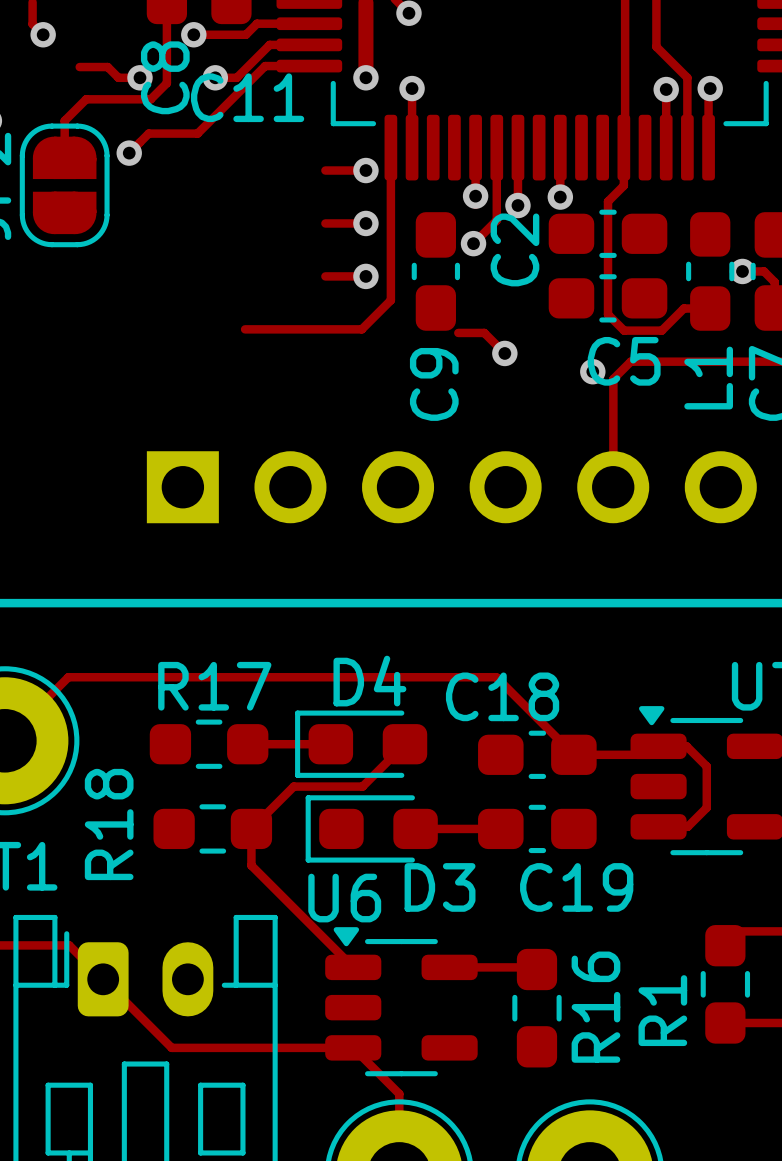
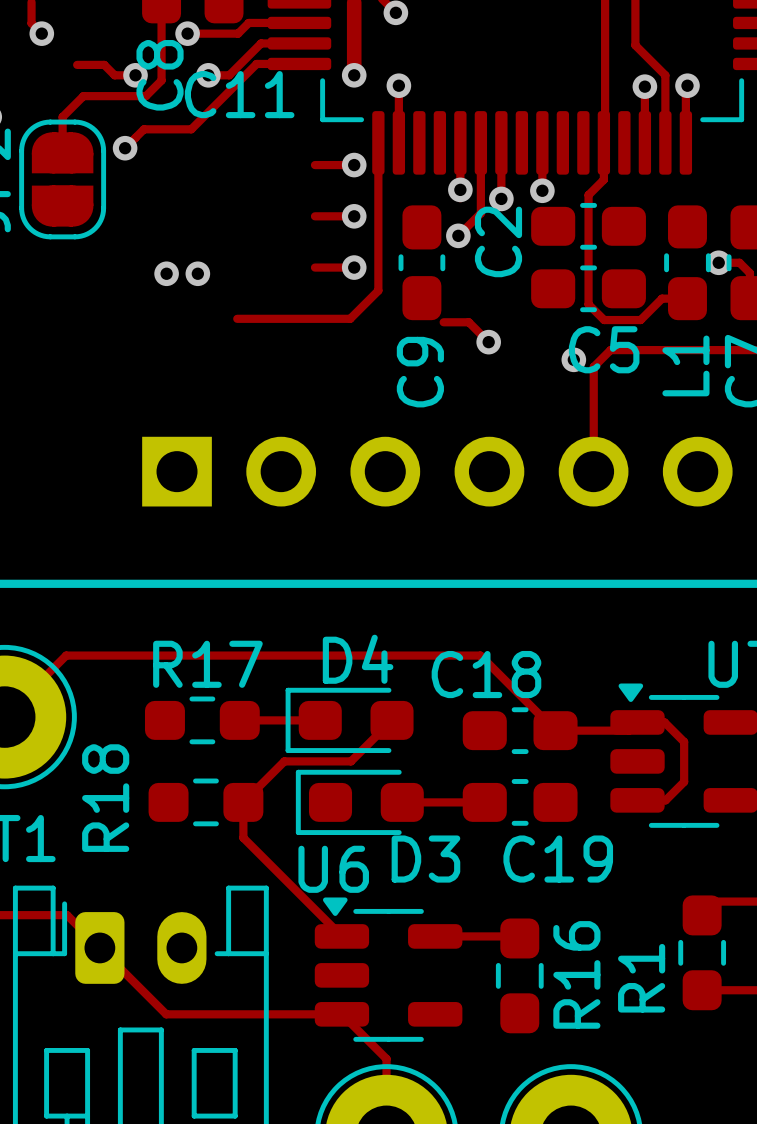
via: none -> (166, 273)
via: none -> (197, 273)

